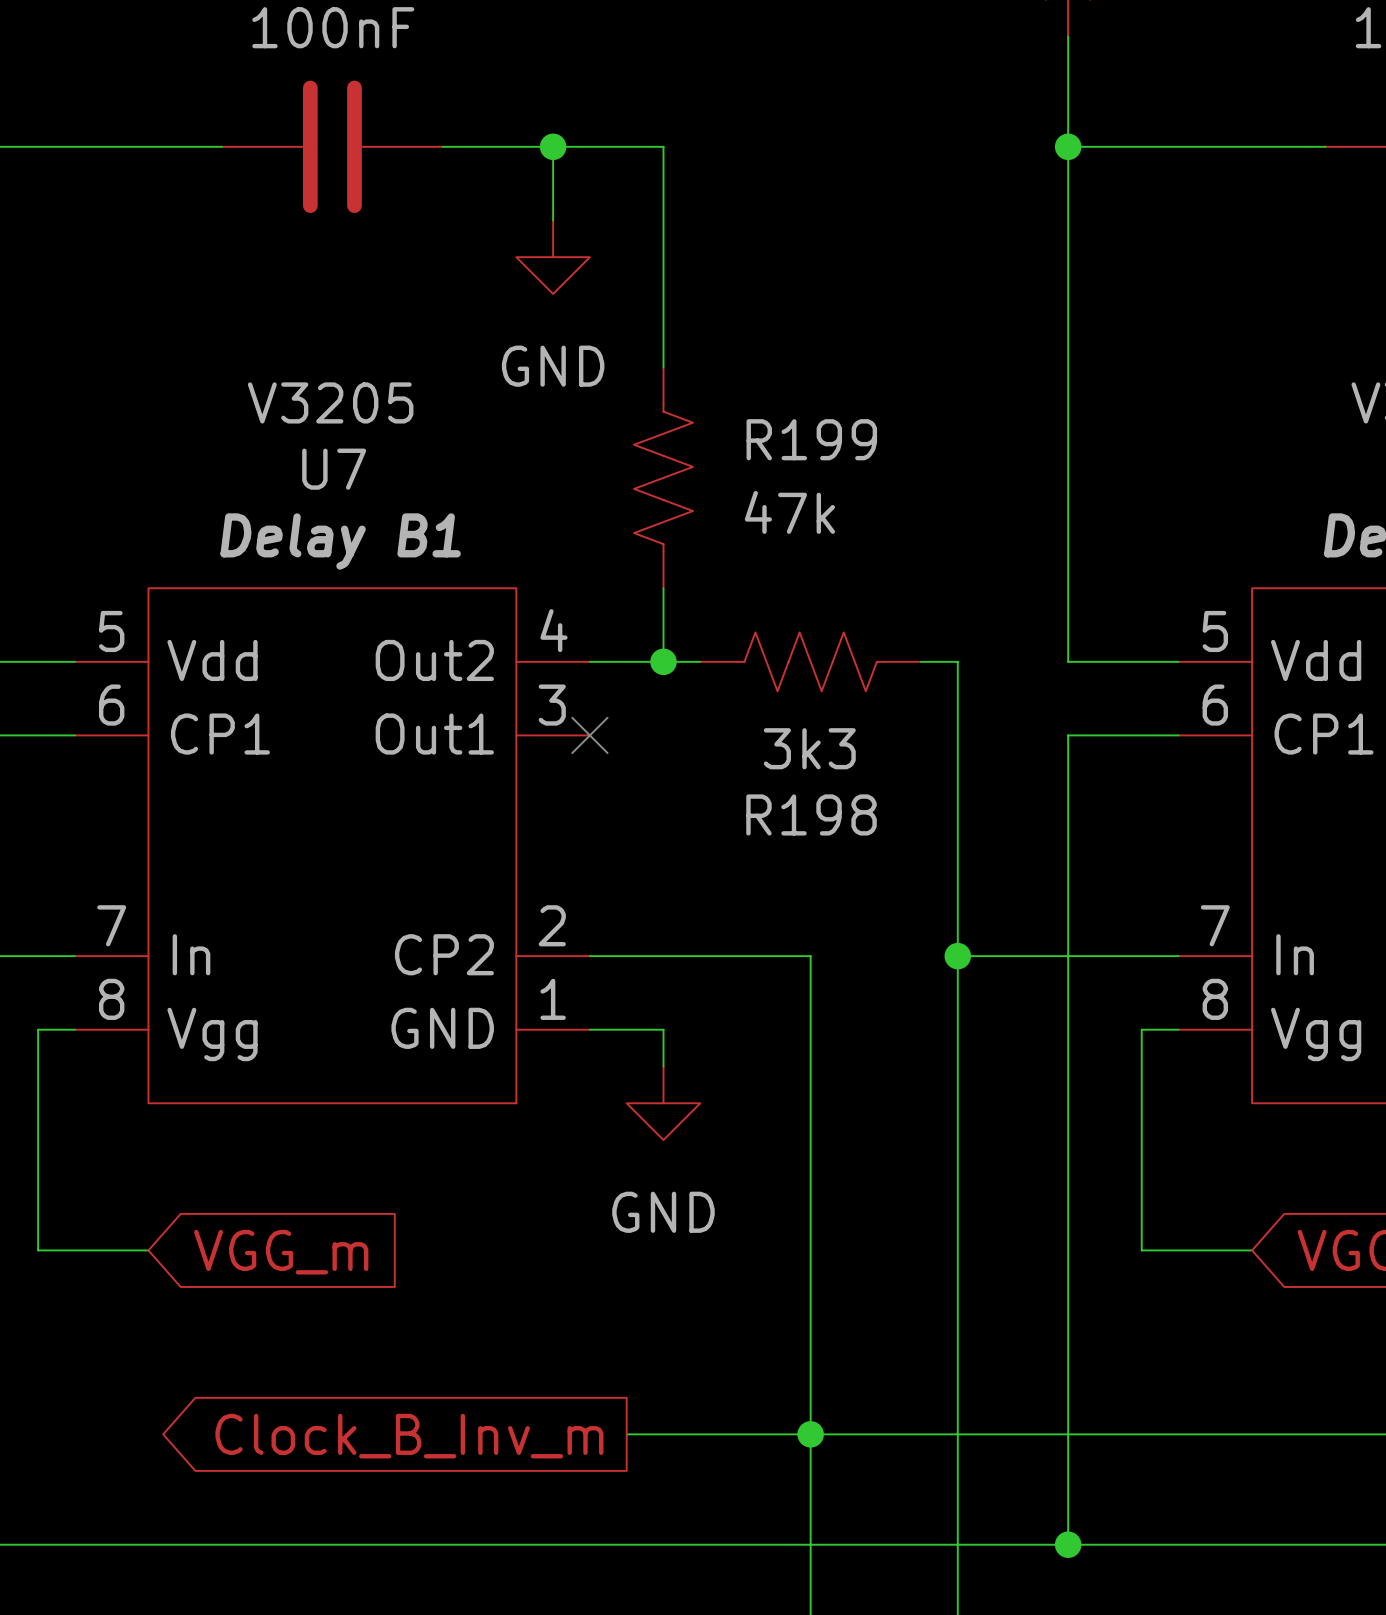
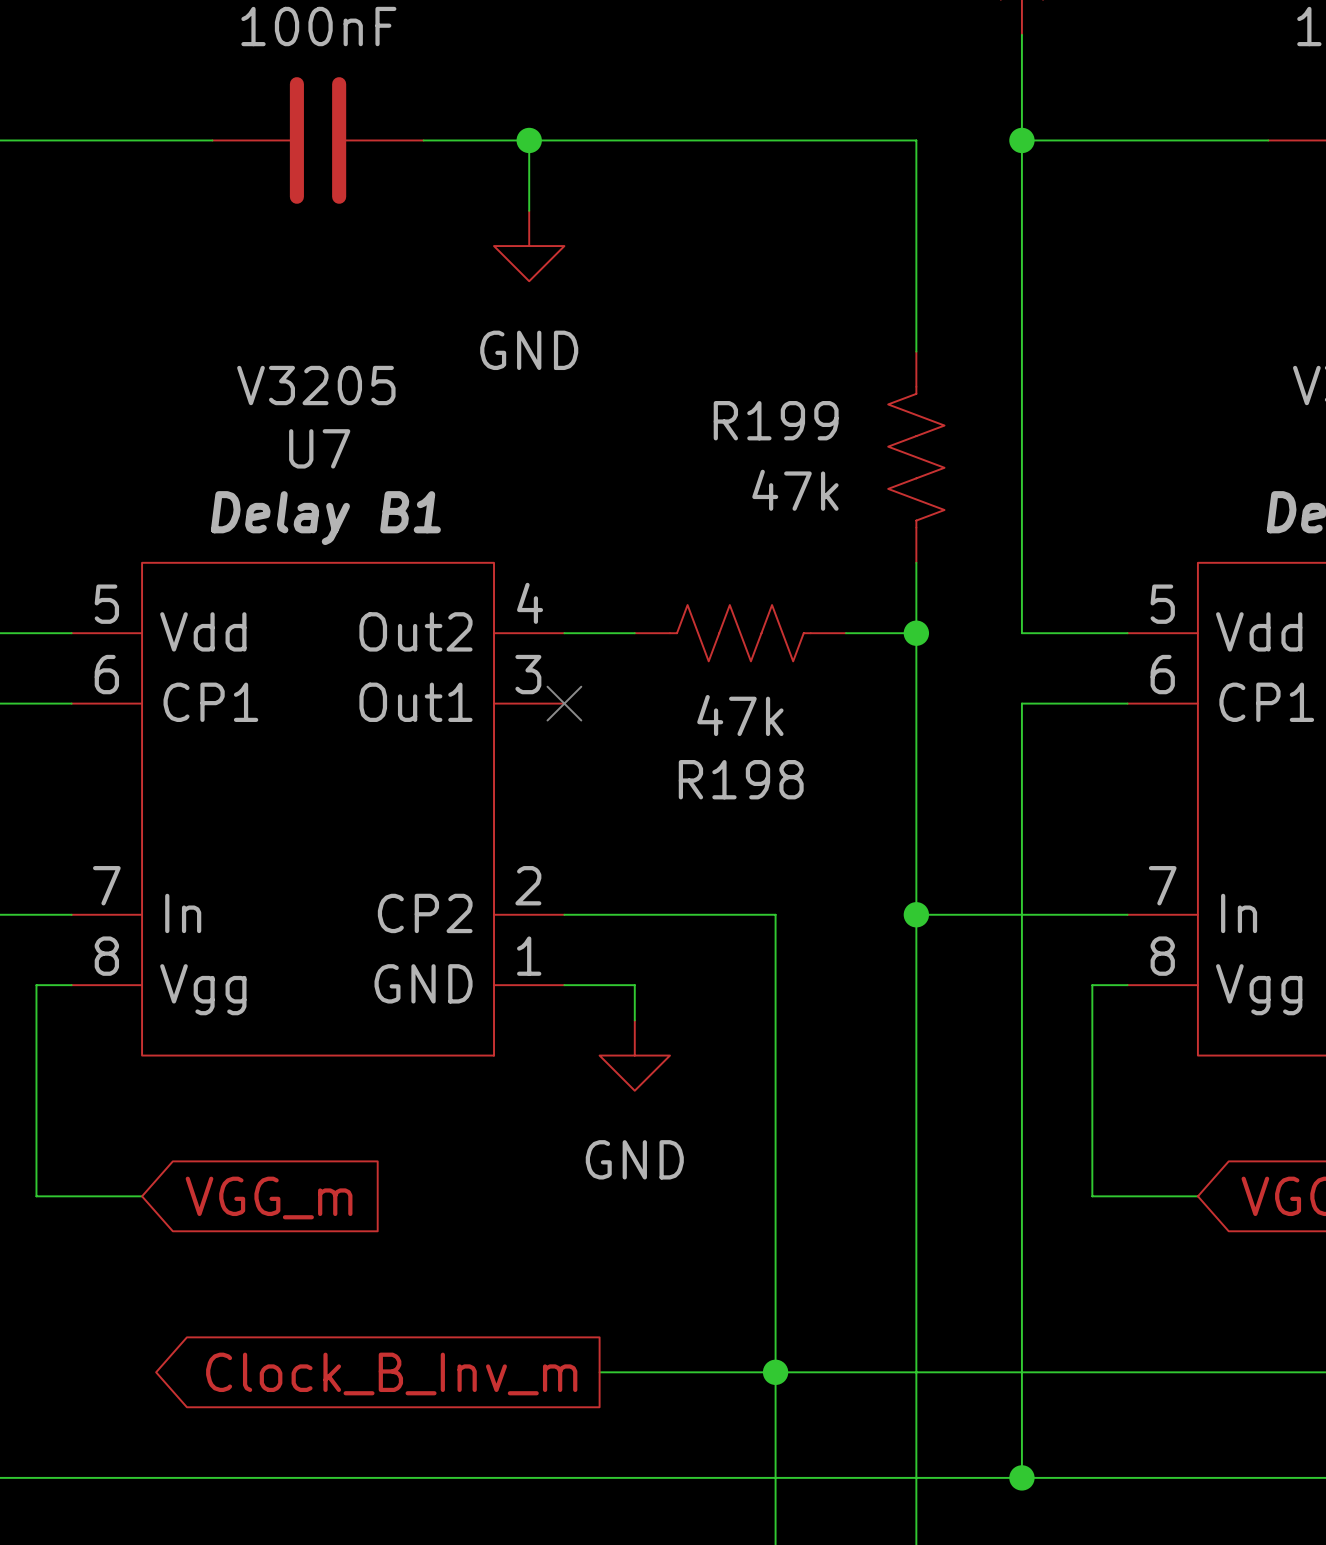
wire: (663, 146) (663, 367) -> (634, 140) (916, 140) (916, 351)
R199 flip: as is (663, 477) -> left-right (916, 457)
R199 position: (663, 477) -> (916, 457)
wire: (663, 588) (663, 661) (700, 661) -> none
wire: none -> (916, 562) (916, 633)
junction: (663, 661) -> none
R198 position: (810, 661) -> (740, 633)
junction: none -> (916, 633)
R198 value: 3k3 (809, 748) -> 47k (740, 715)

